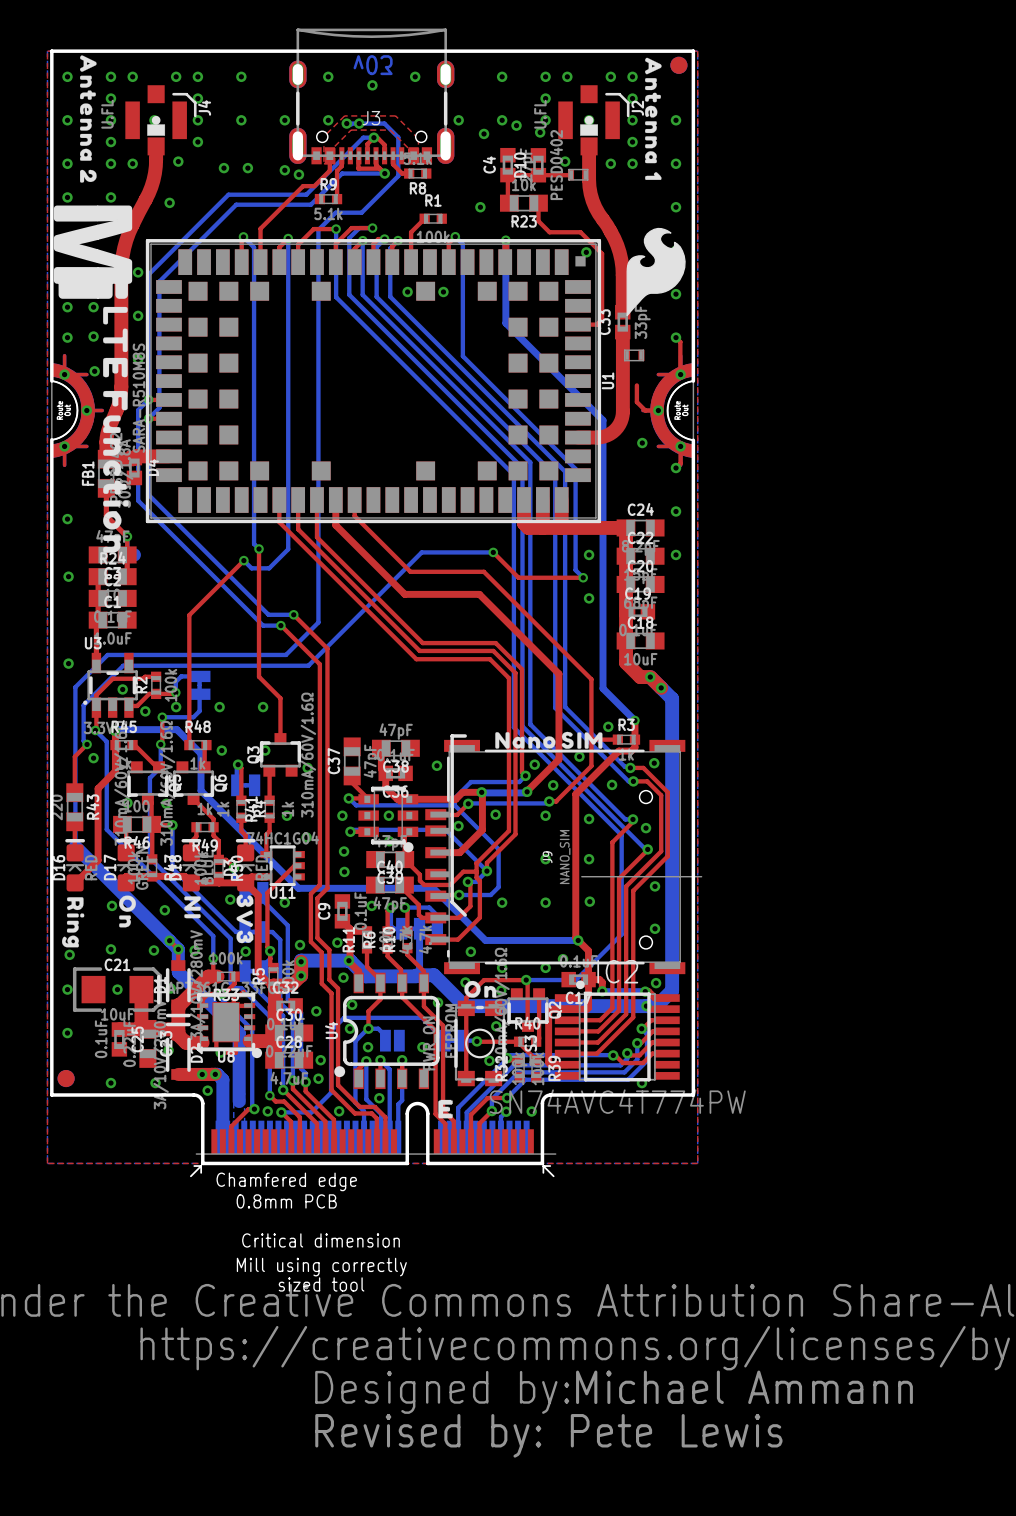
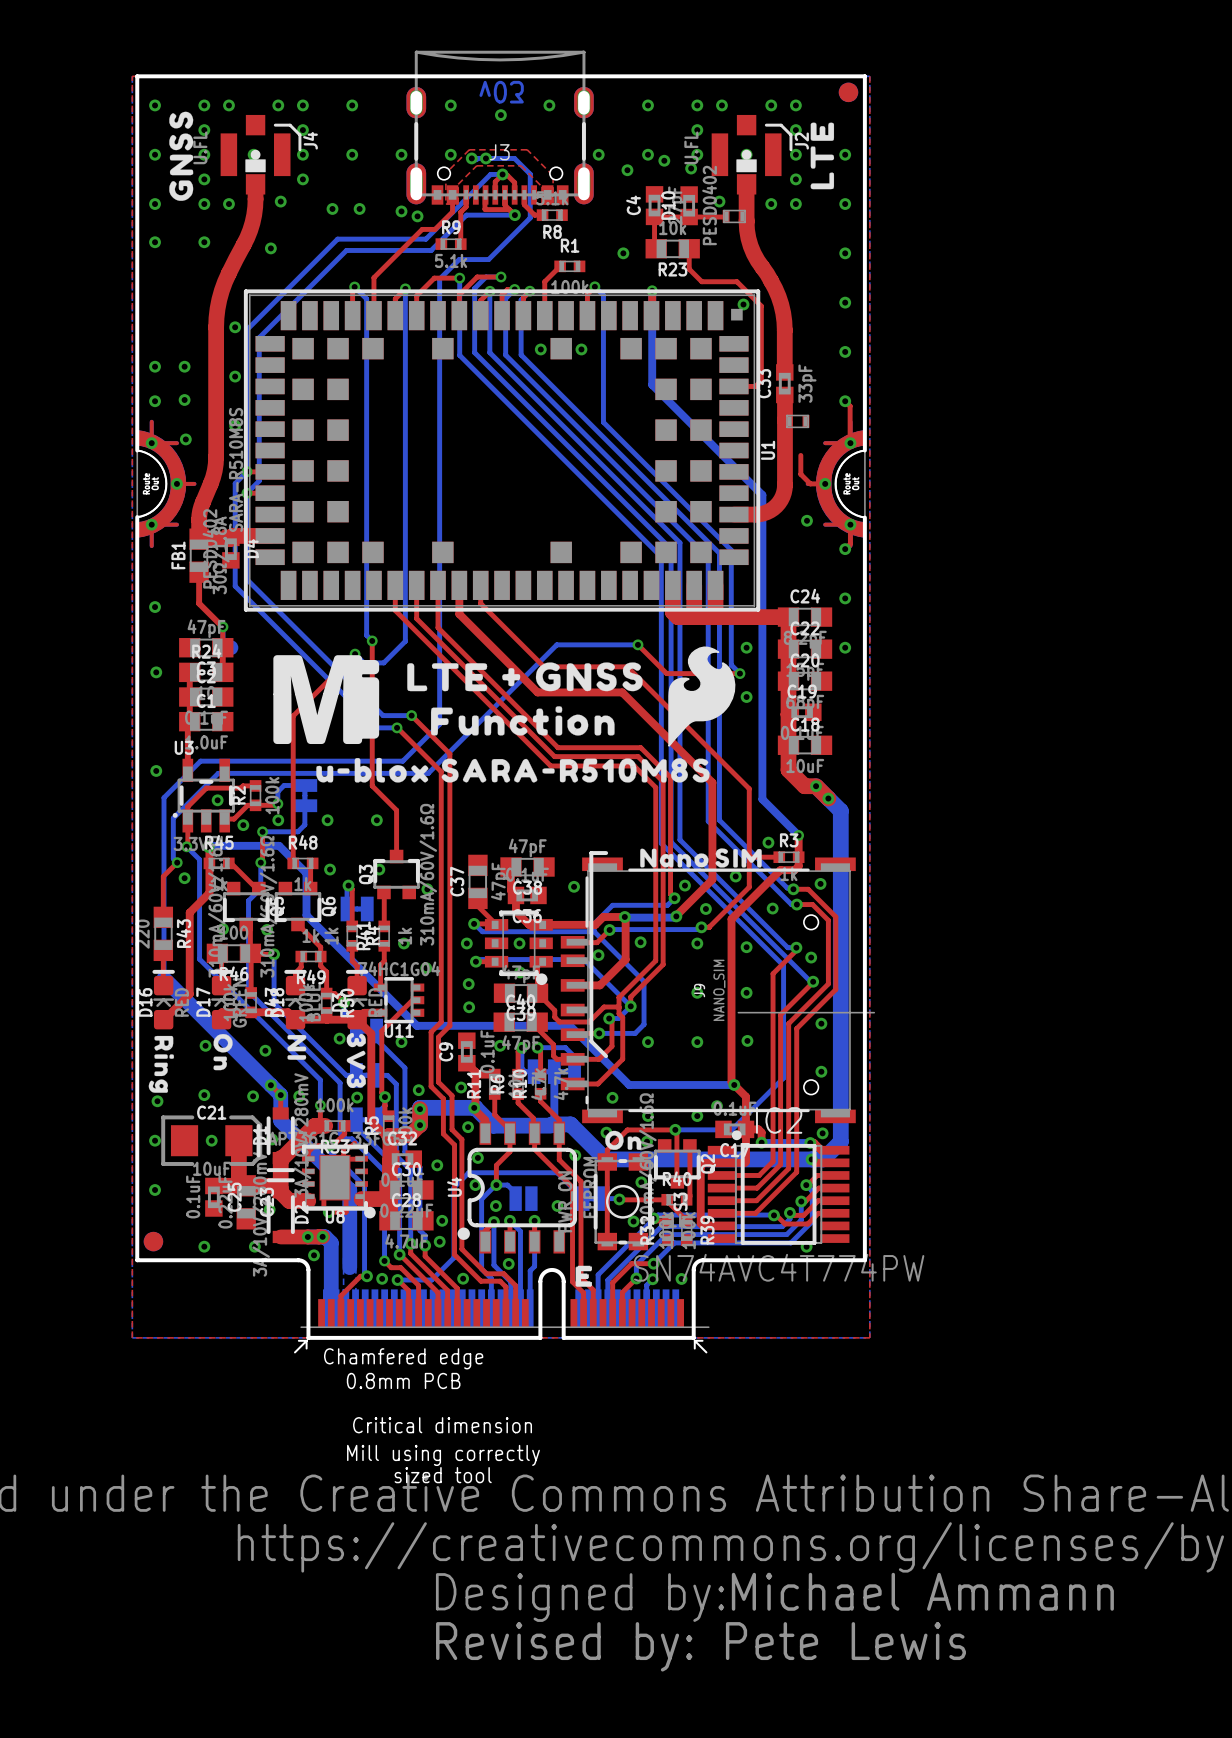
drawing shape: [80, 55, 97, 183] -> [169, 111, 194, 201]
drawing shape: [645, 57, 662, 180] -> [810, 122, 835, 190]
drawing: [53, 205, 133, 553] -> none
drawing position: (656, 272) -> (701, 696)
drawing: none -> [273, 655, 710, 783]

